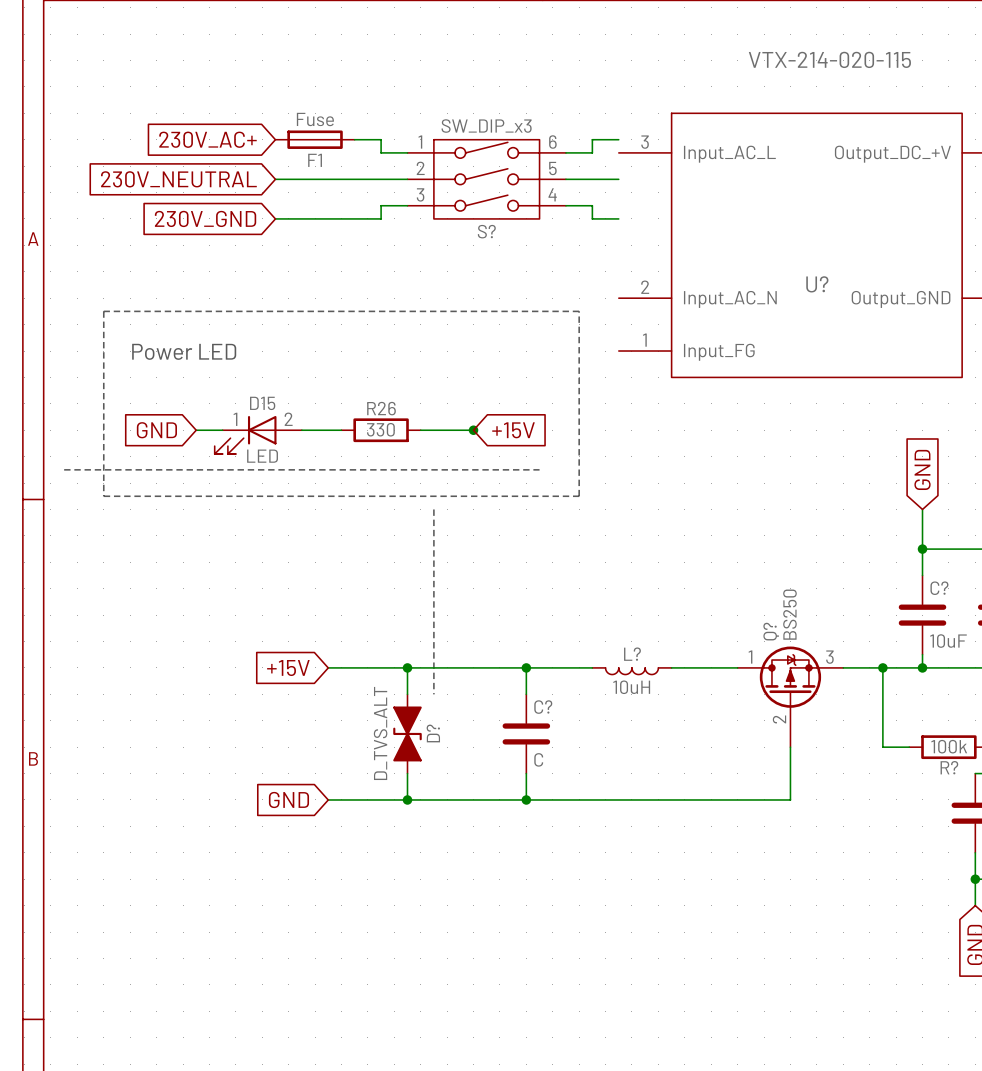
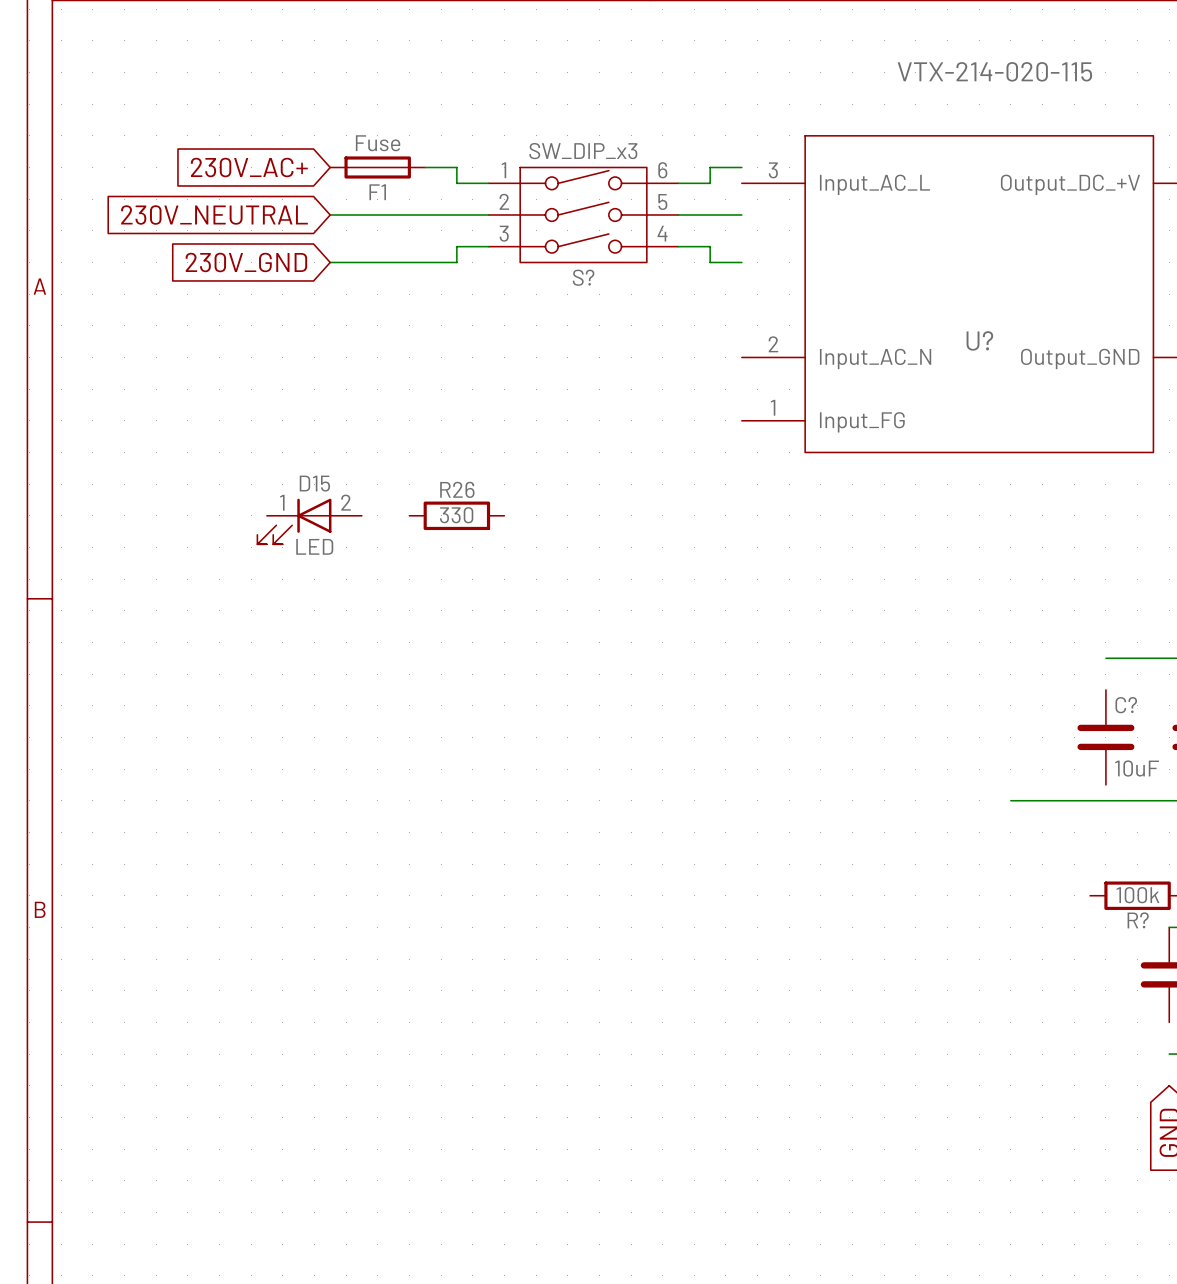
line: (103, 311) (103, 496) (579, 496) (579, 311) (103, 311) -> none
text: Power LED (184, 351) -> none
global label: GND (156, 430) -> none
wire: (196, 430) (222, 430) -> none
wire: (301, 430) (341, 430) -> none
wire: (420, 430) (473, 430) -> none
junction: (473, 430) -> none
global label: +15V (513, 430) -> none
line: (64, 469) (539, 469) -> none
global label: GND (922, 469) -> none
line: (433, 509) (433, 694) -> none
wire: (922, 509) (922, 575) -> none
junction: (922, 549) -> none
wire: (922, 654) (922, 667) -> none
wire: (328, 667) (592, 667) -> none
wire: (407, 667) (407, 694) -> none
junction: (407, 667) -> none
wire: (526, 667) (526, 694) -> none
junction: (526, 667) -> none
wire: (671, 667) (737, 667) -> none
wire: (882, 667) (882, 747) (909, 747) -> none
junction: (882, 667) -> none
junction: (922, 667) -> none
global label: +15V (288, 668) -> none
L?: 10uH (631, 671) -> none
Q?: BS250 (790, 696) -> none
D?: D_TVS_ALT (407, 733) -> none
C?: C (526, 733) -> none
wire: (790, 747) (790, 799) (328, 799) -> none
wire: (407, 773) (407, 799) -> none
wire: (526, 773) (526, 799) -> none
global label: GND (288, 799) -> none
junction: (407, 799) -> none
junction: (526, 799) -> none
wire: (975, 852) (975, 905) -> none
junction: (975, 879) -> none

